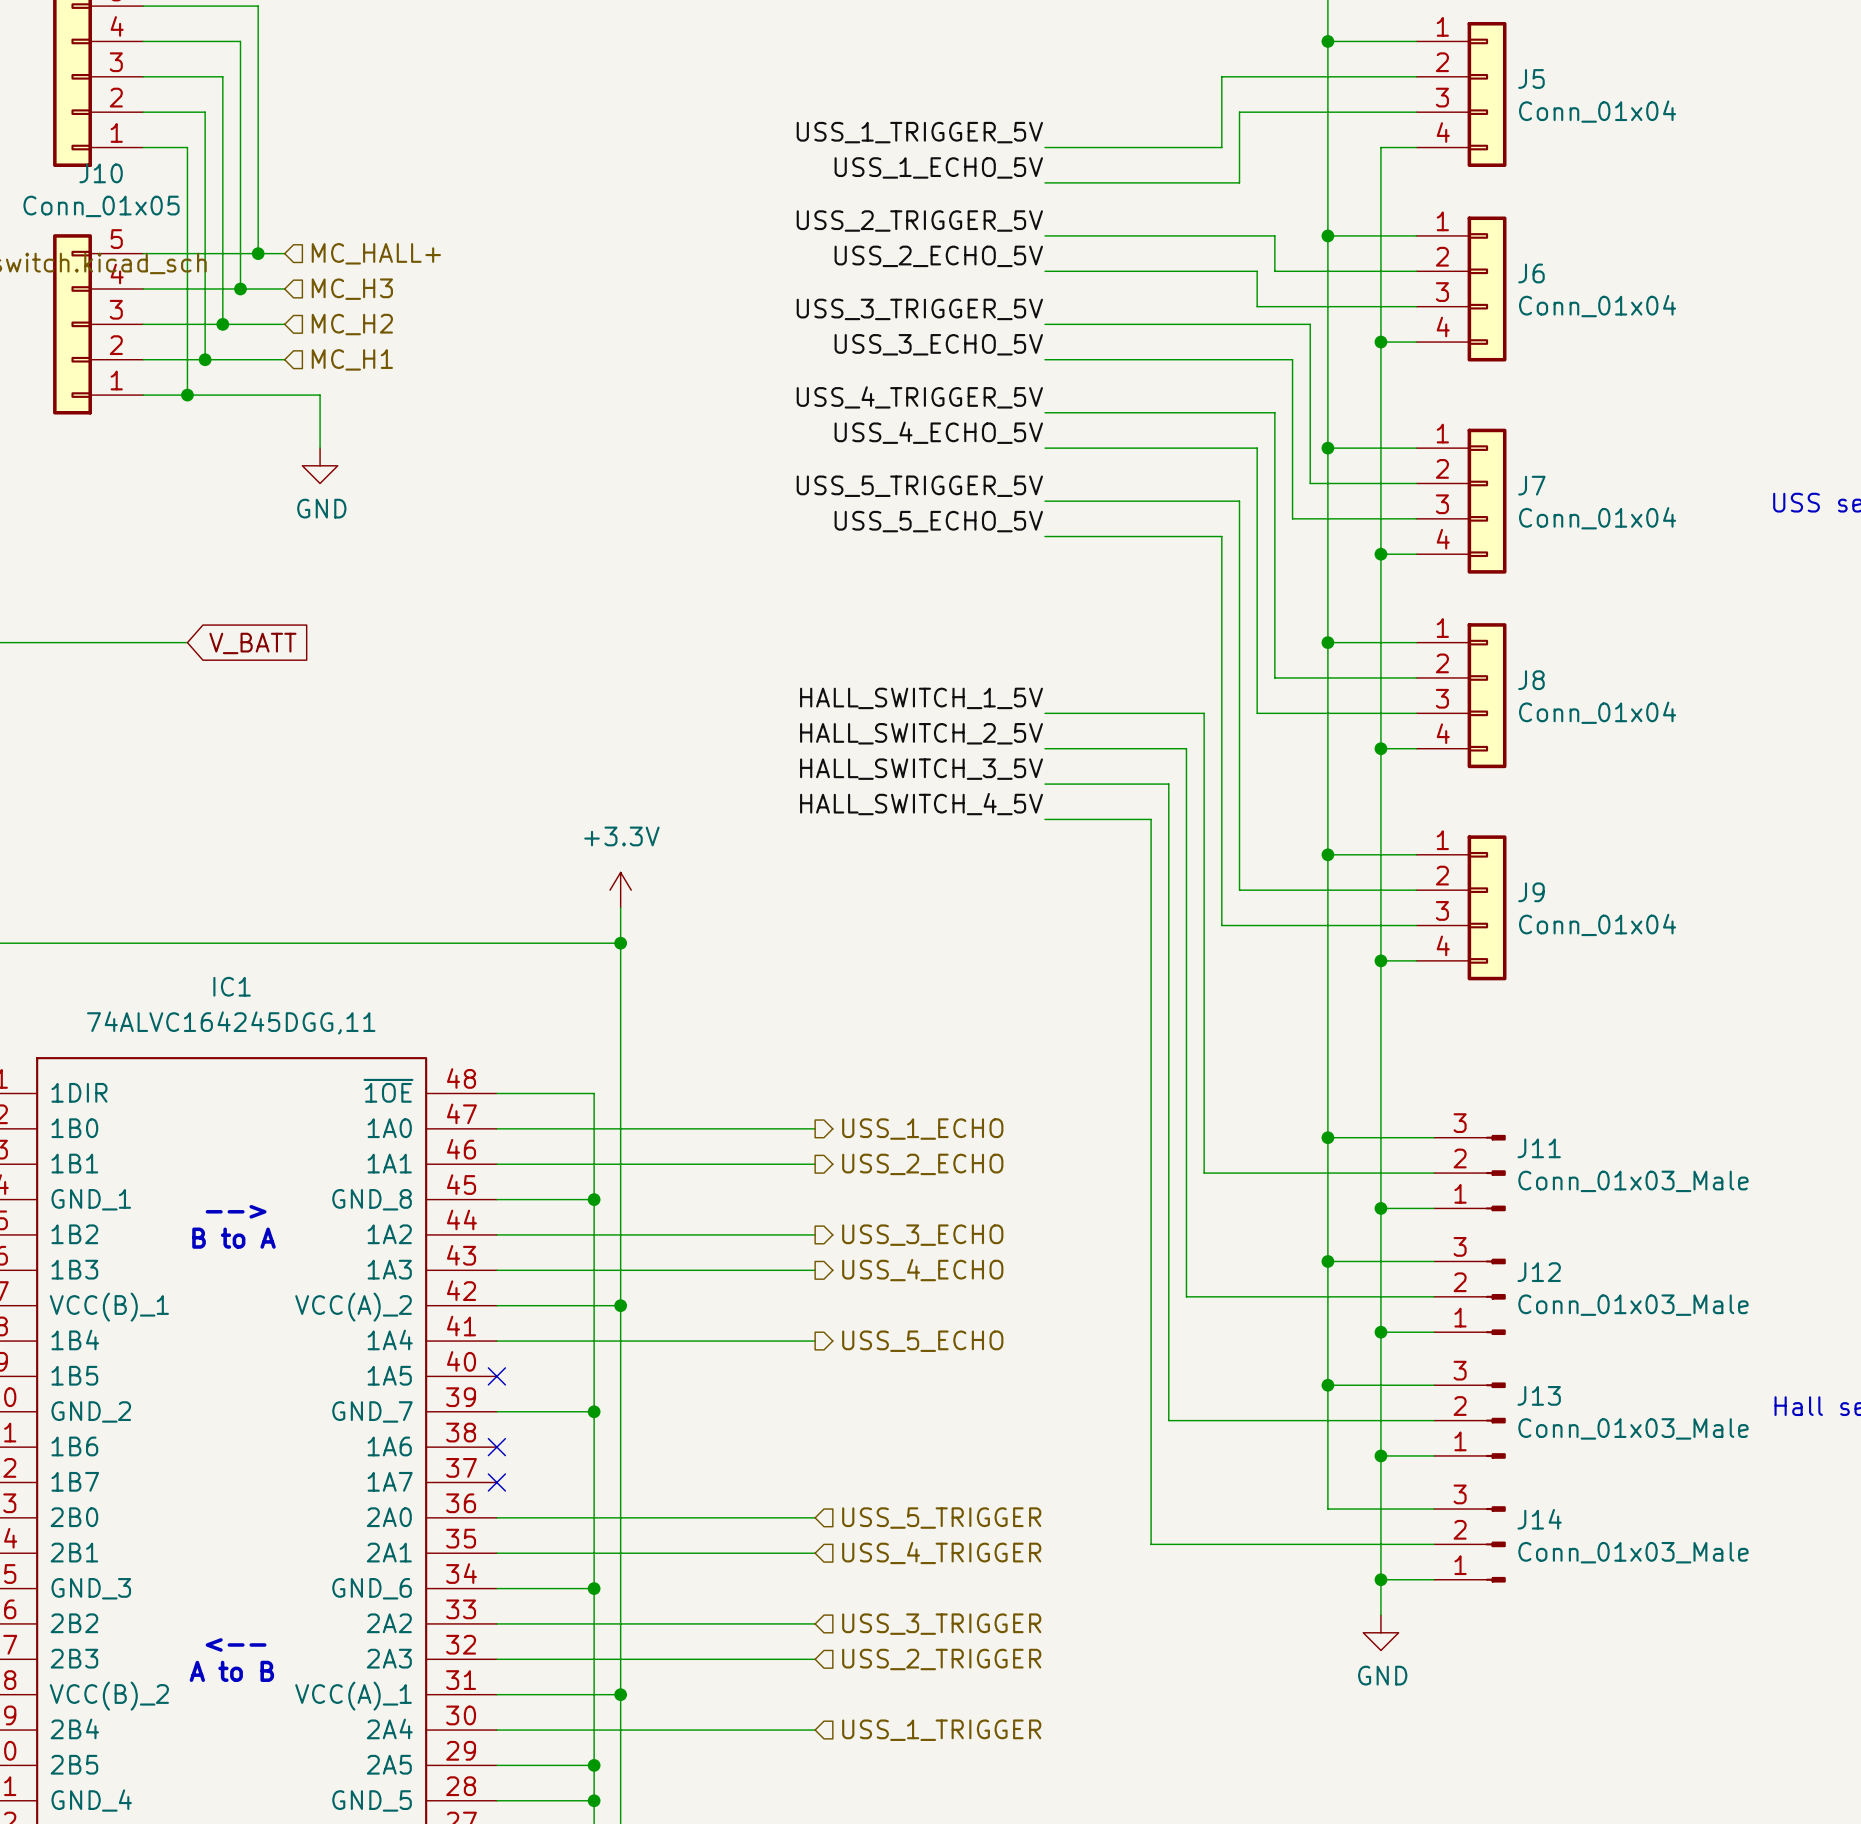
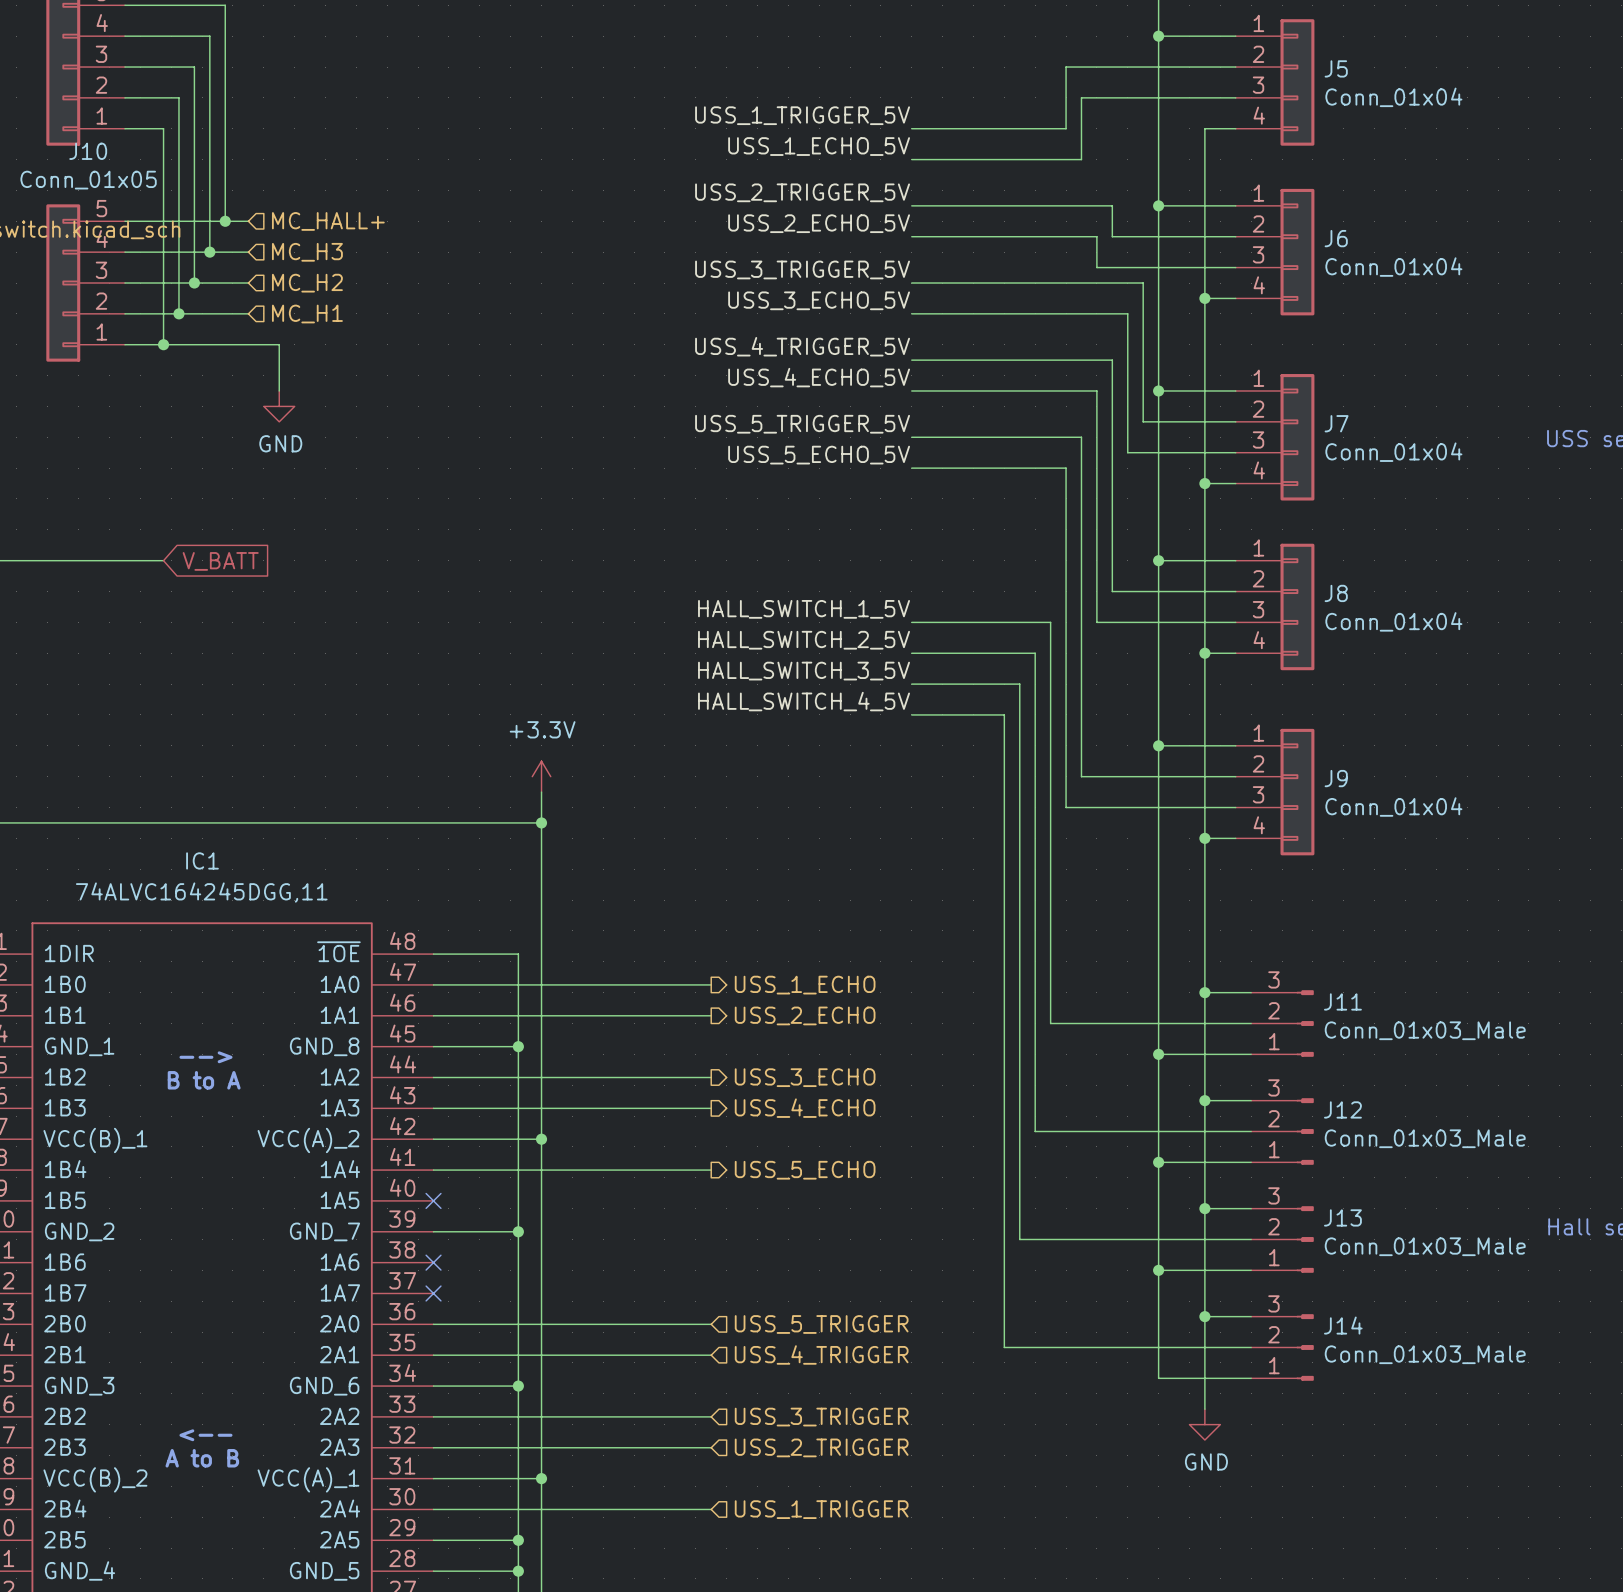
wire: (1327, 1137) (1380, 1137) -> (1158, 1270) (1204, 1270)
junction: (1327, 1137) -> none
junction: none -> (1204, 992)
junction: none -> (1158, 1054)
junction: (1380, 1208) -> none
wire: (1327, 1261) (1380, 1261) -> (1158, 1054) (1204, 1054)
junction: (1327, 1261) -> none
junction: none -> (1204, 1100)
junction: none -> (1158, 1162)
junction: (1380, 1332) -> none
wire: (1327, 1385) (1380, 1385) -> (1158, 1162) (1204, 1162)
junction: (1327, 1385) -> none
junction: none -> (1204, 1208)
junction: none -> (1158, 1270)
junction: (1380, 1455) -> none
wire: (1327, 1509) (1380, 1509) -> (1158, 1316) (1158, 1378) (1204, 1378)
junction: none -> (1204, 1316)
junction: (1380, 1579) -> none

